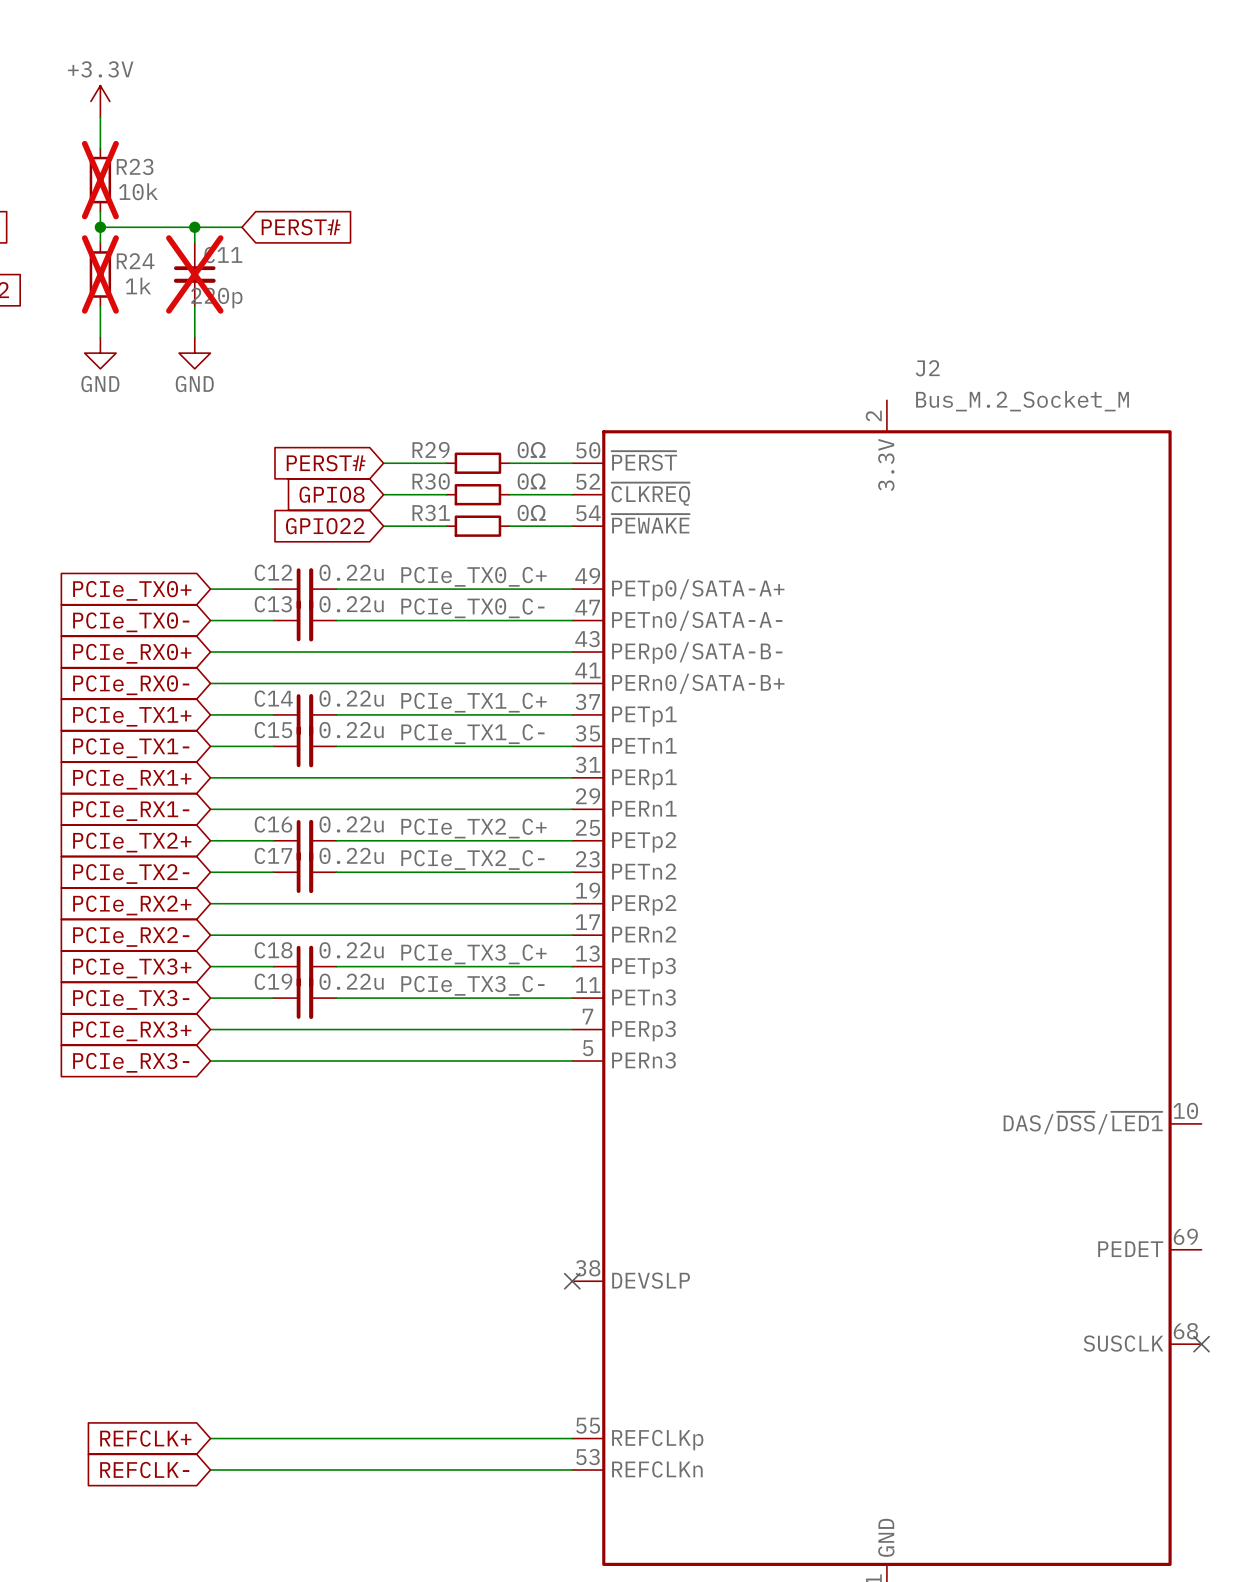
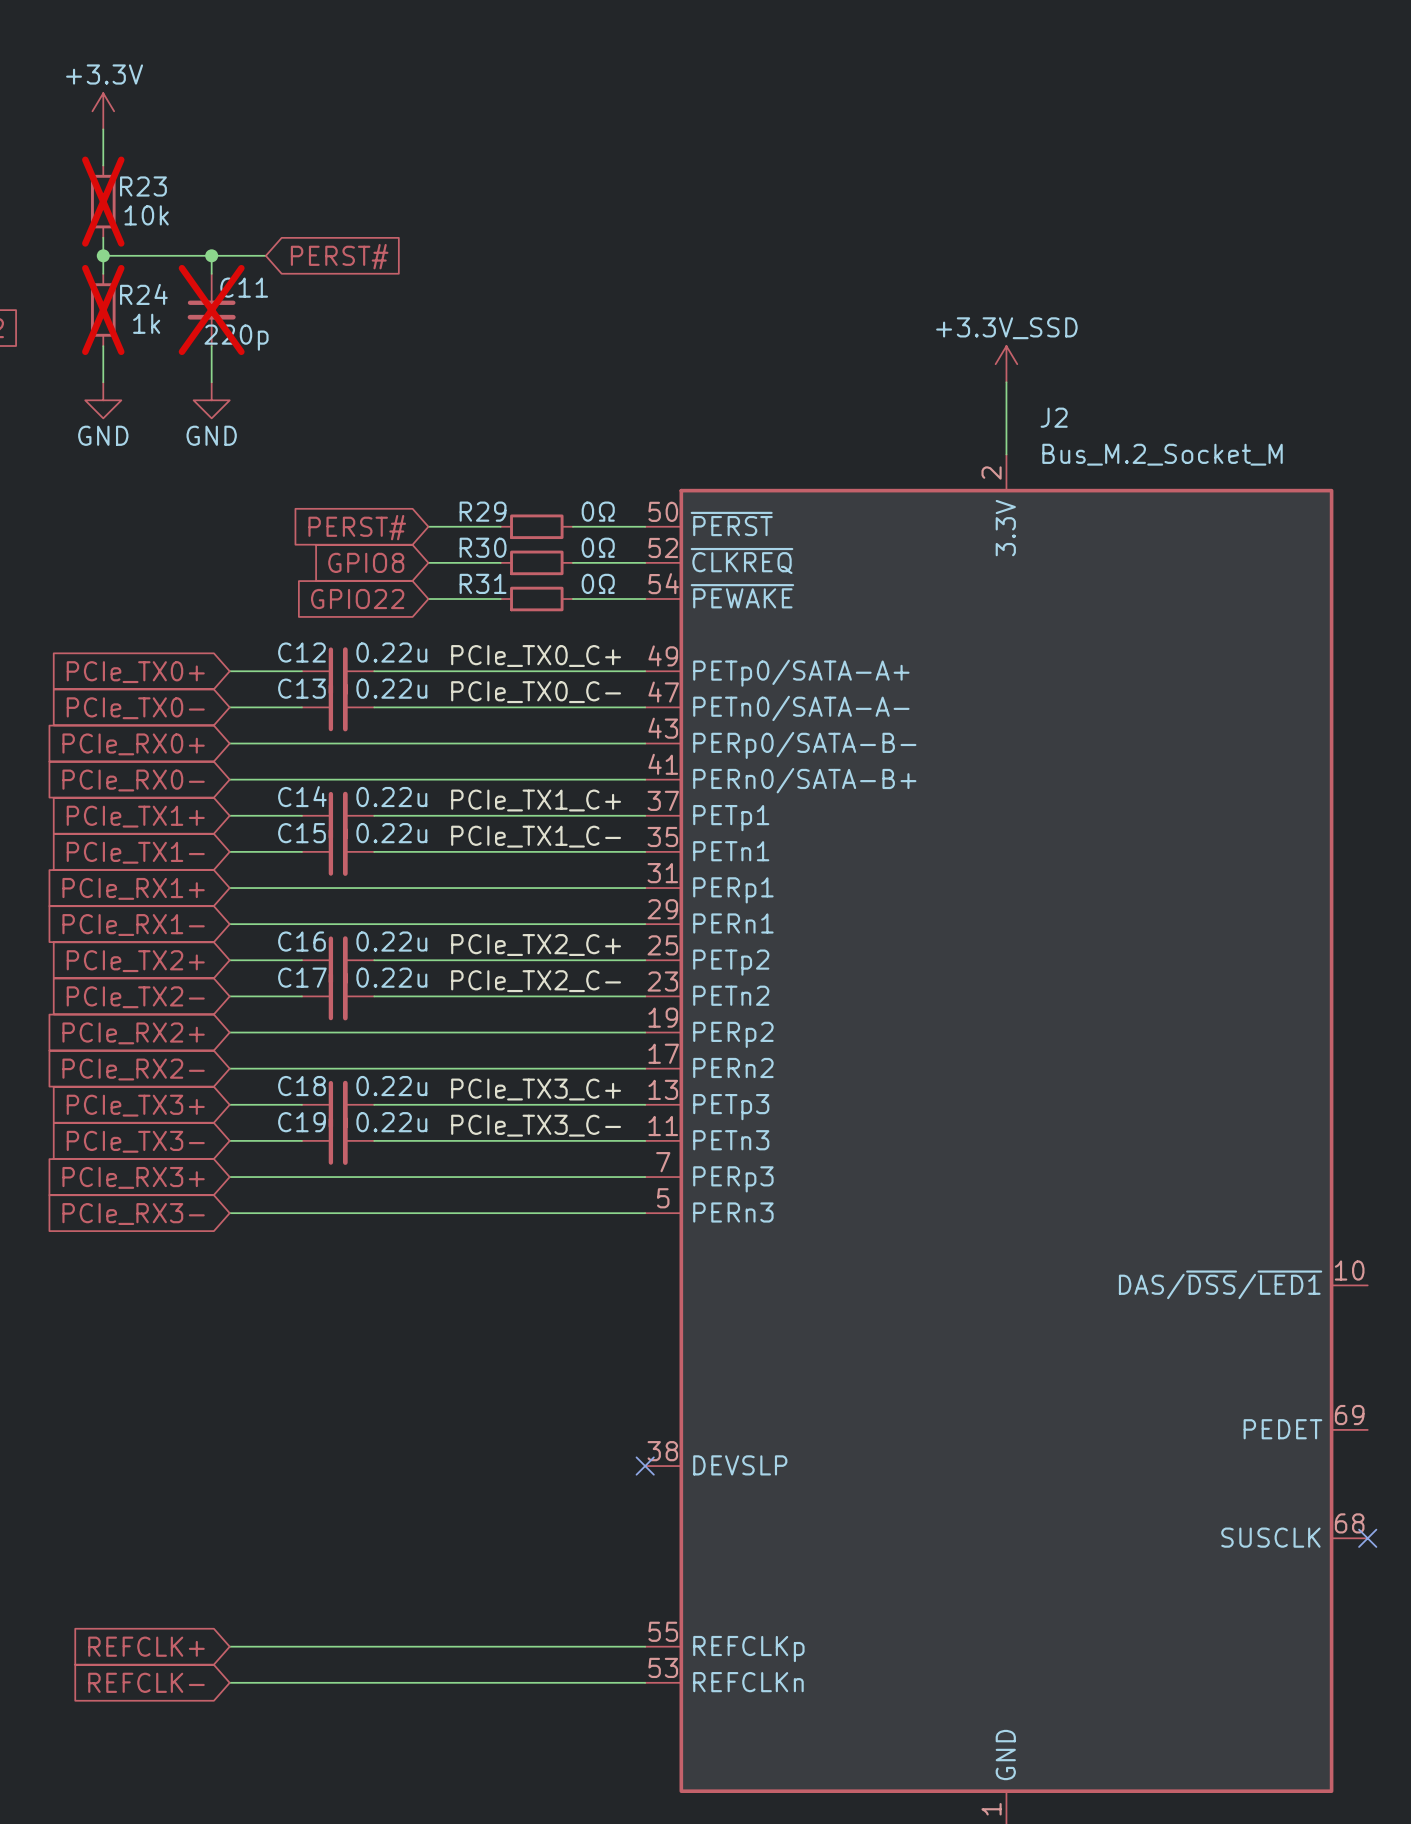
power symbol: none -> +3.3V_SSD (1006, 364)
wire: none -> (1006, 382) (1006, 454)

